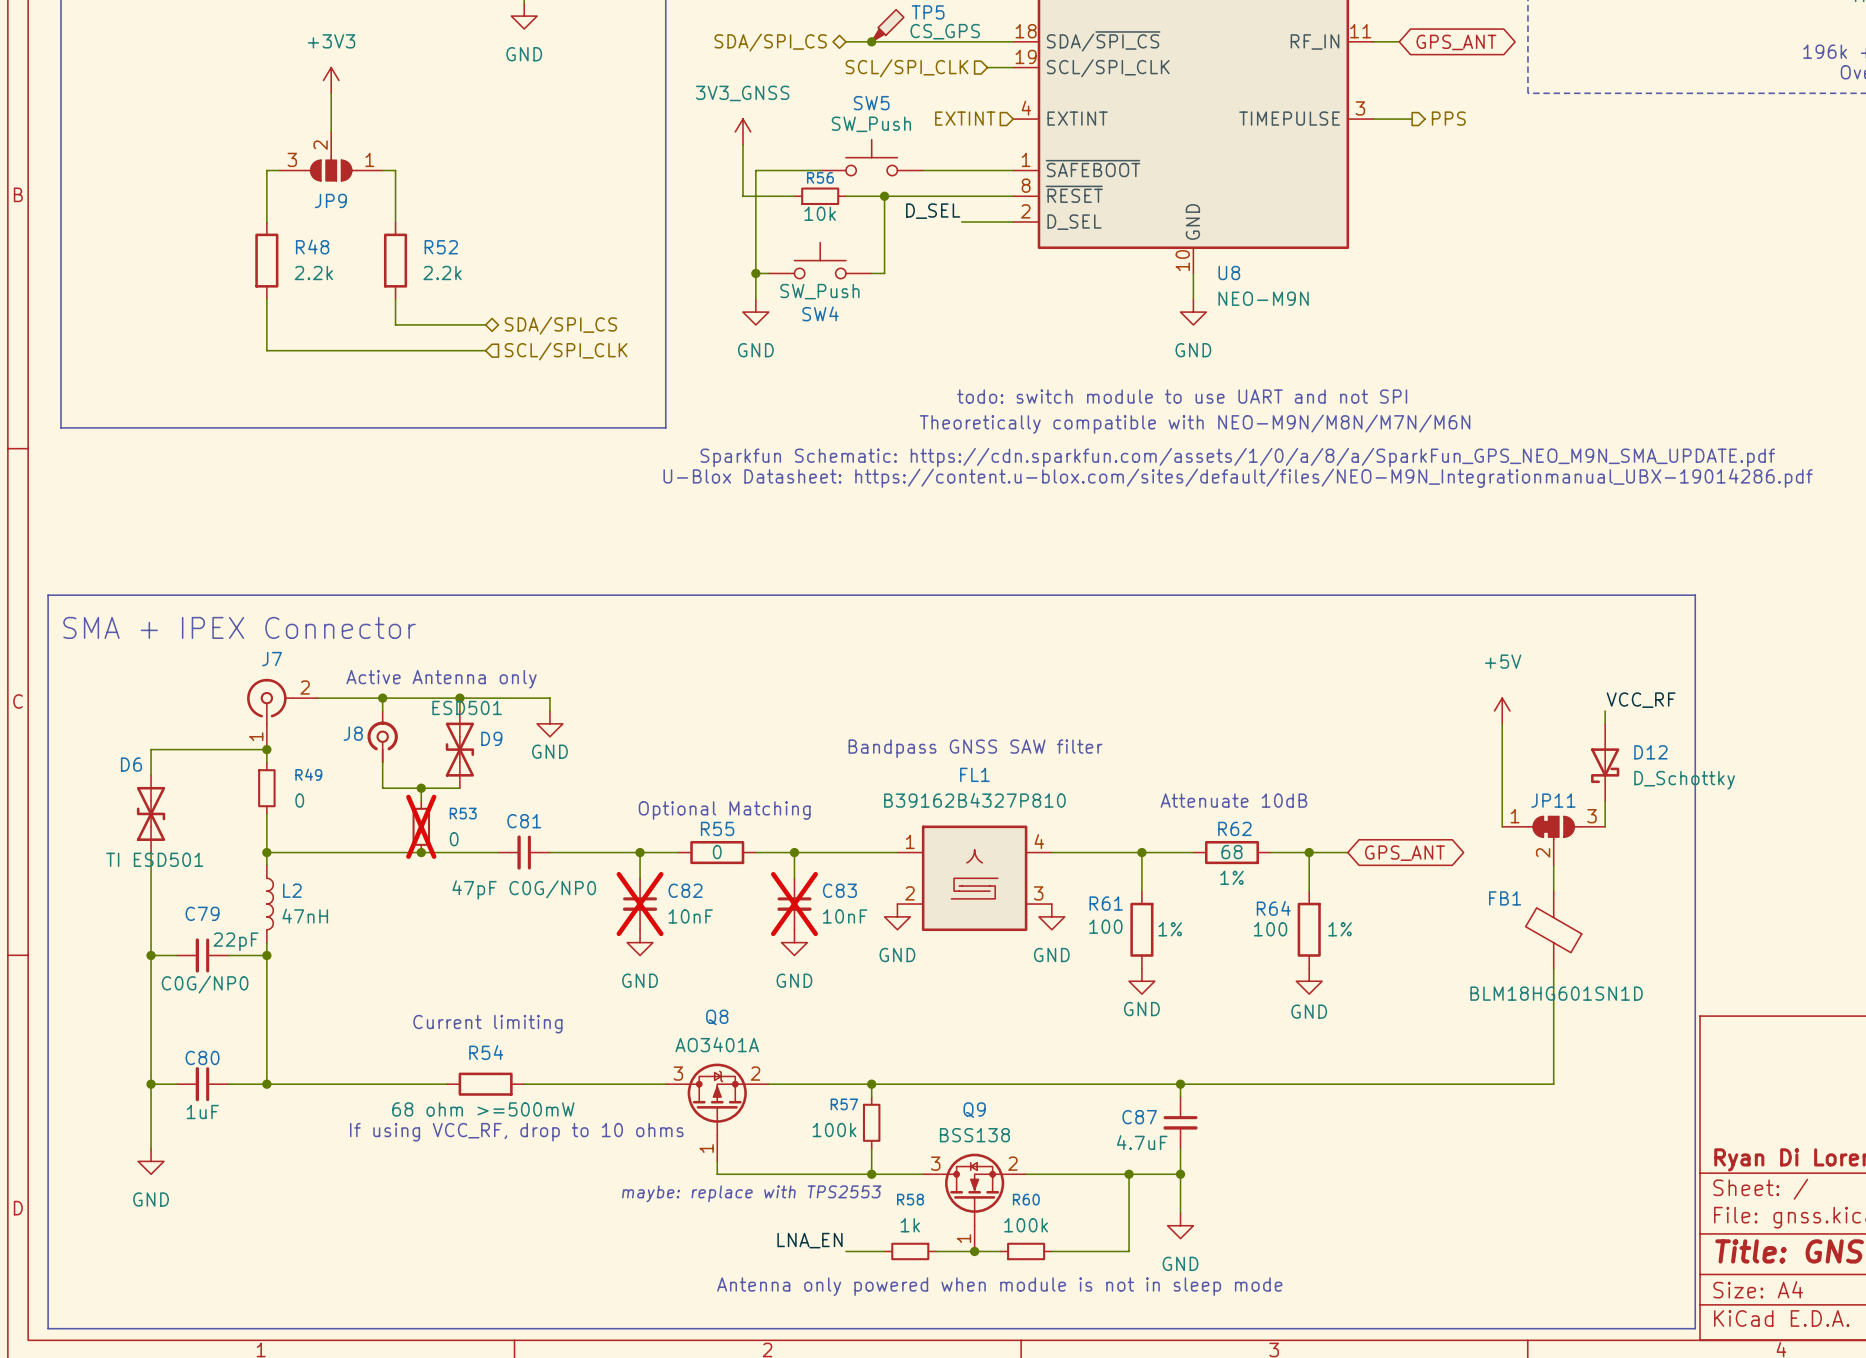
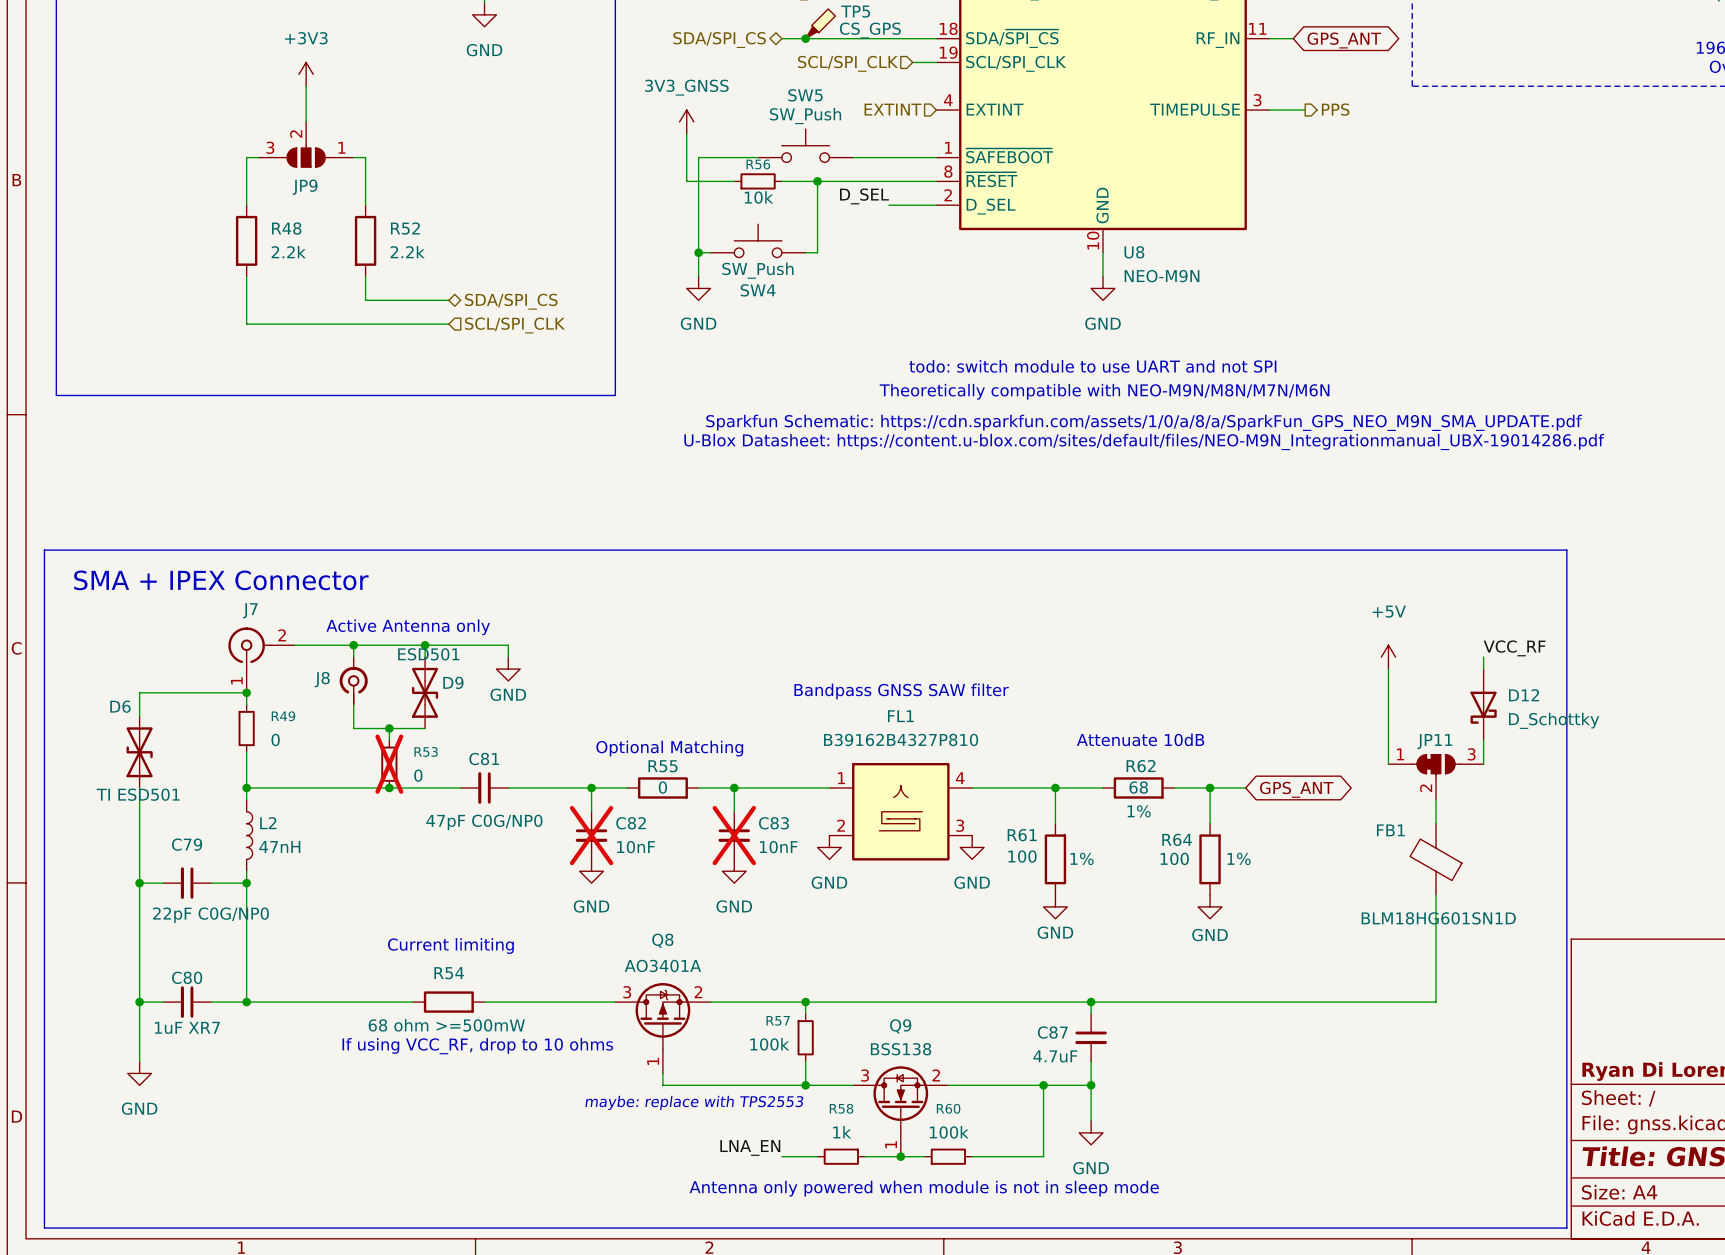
C79 value: 22pF (235, 941) -> 22pF C0G/NP0 (211, 915)
C79 text: C0G/NP0 (205, 984) -> none
C80 value: 1uF (202, 1112) -> 1uF XR7 (187, 1027)

